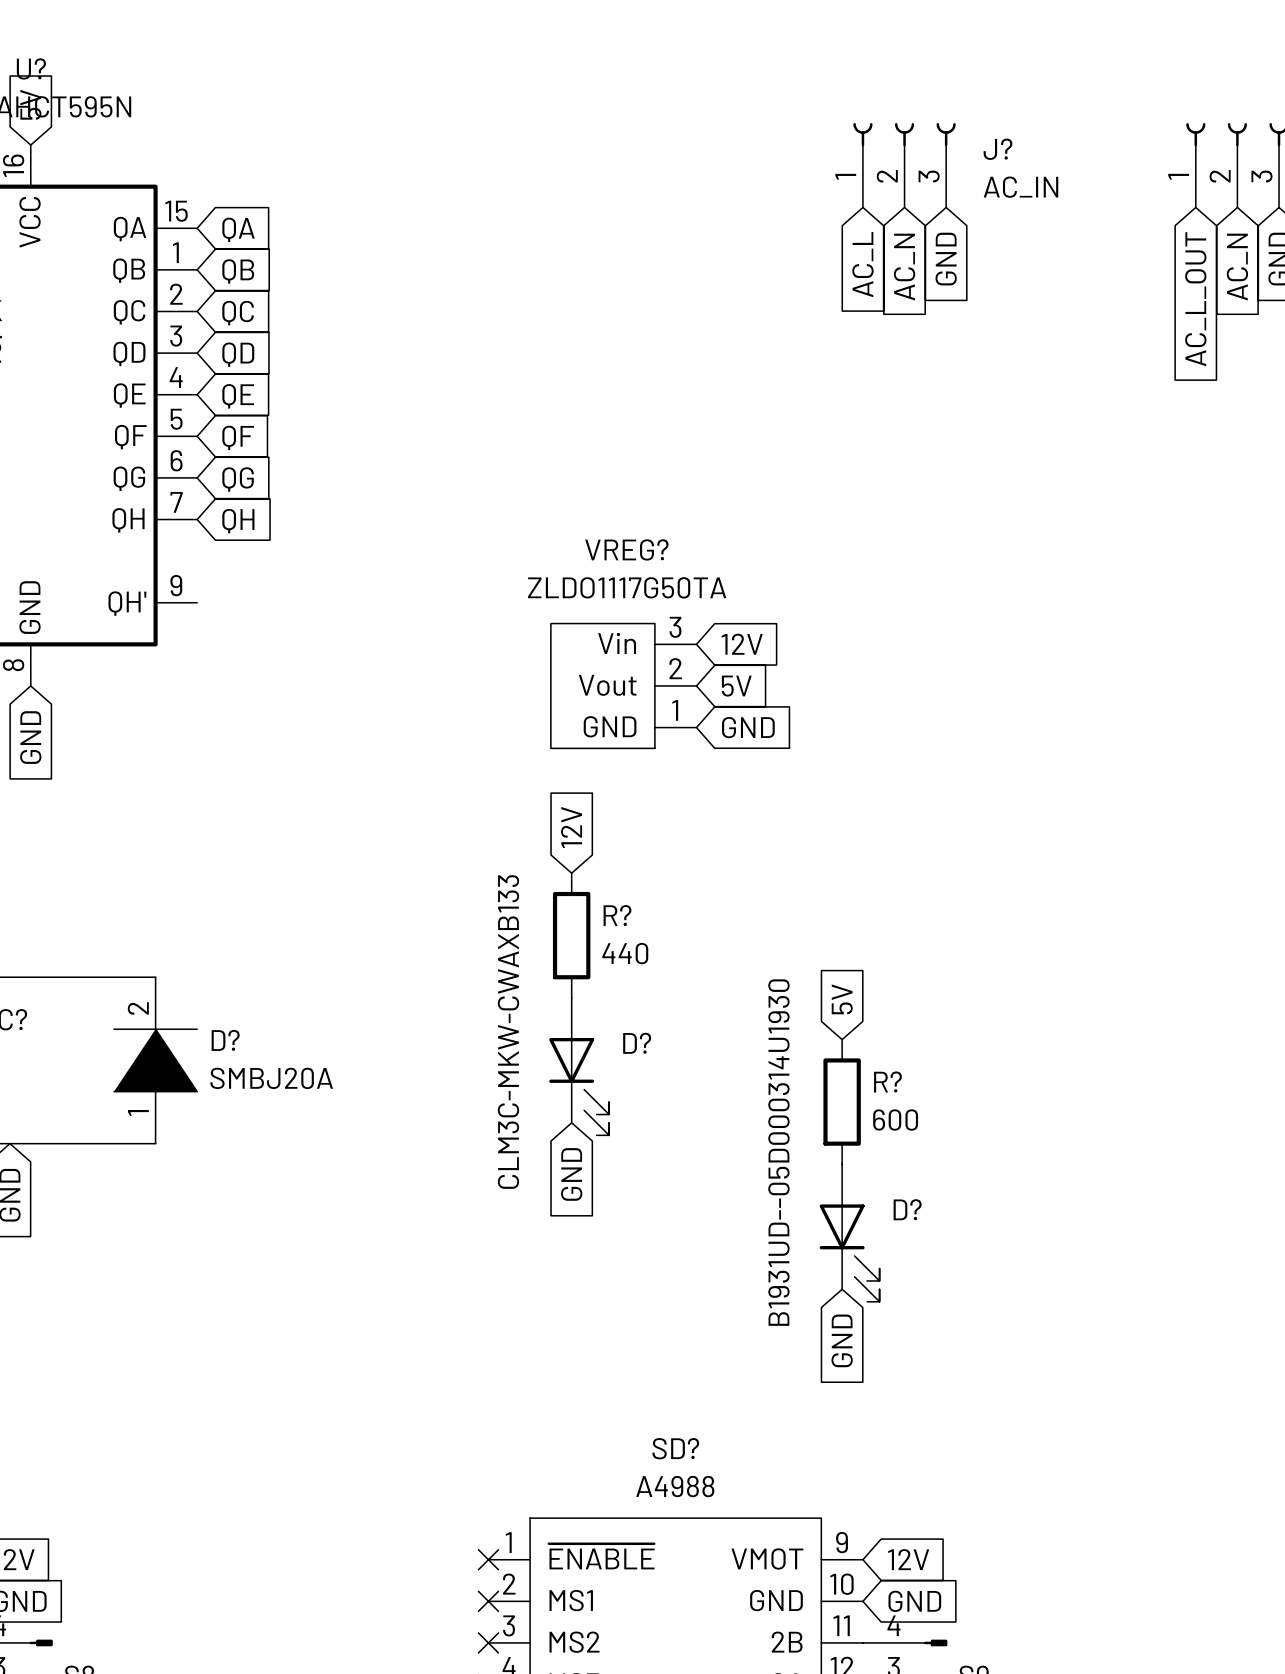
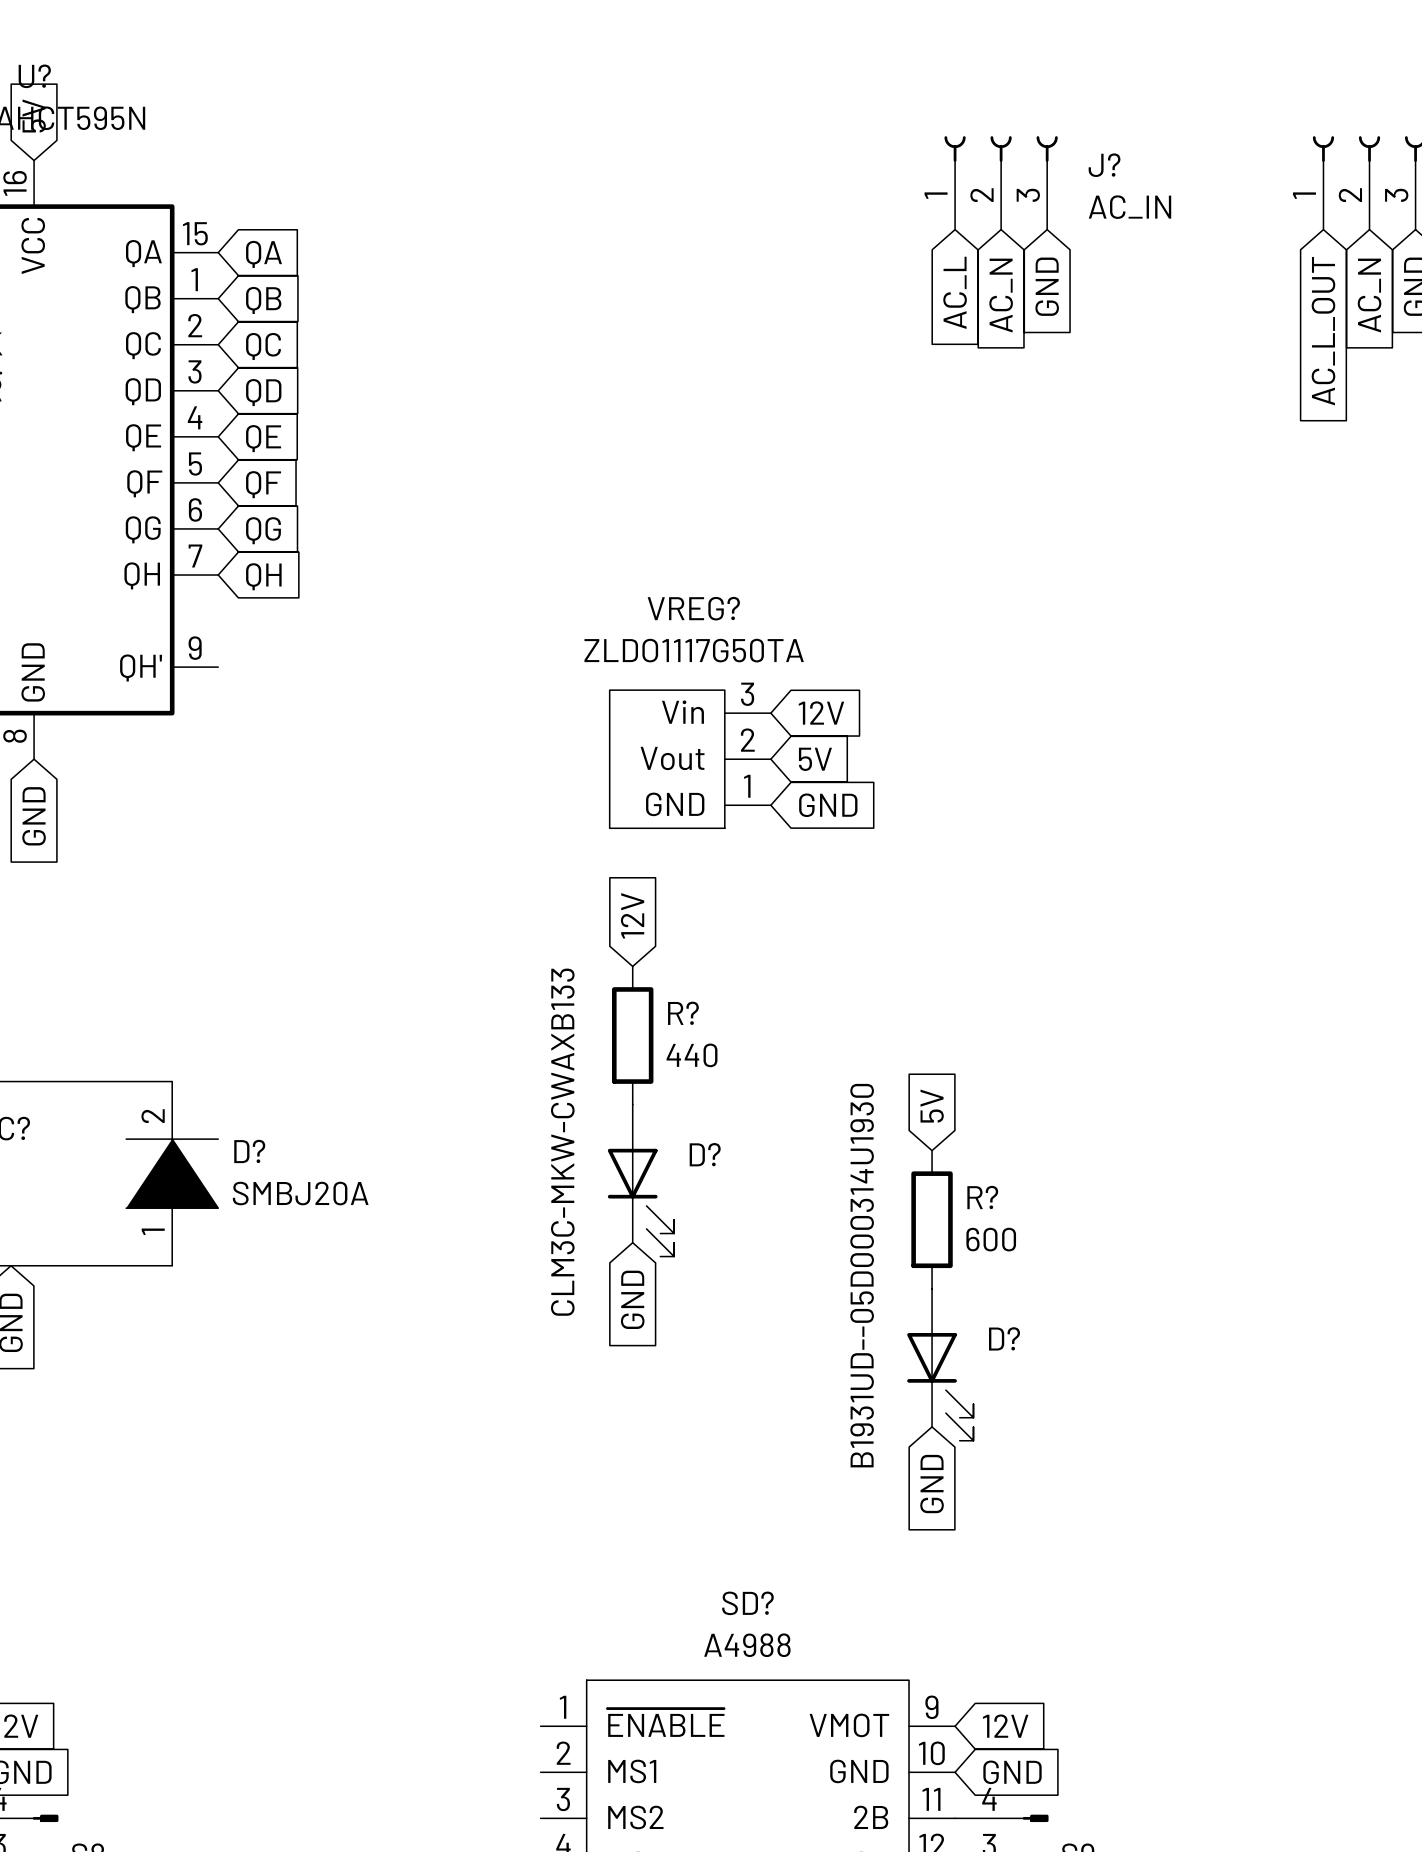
no-connect mark: (488, 1559) -> none
no-connect mark: (488, 1601) -> none
no-connect mark: (488, 1642) -> none

